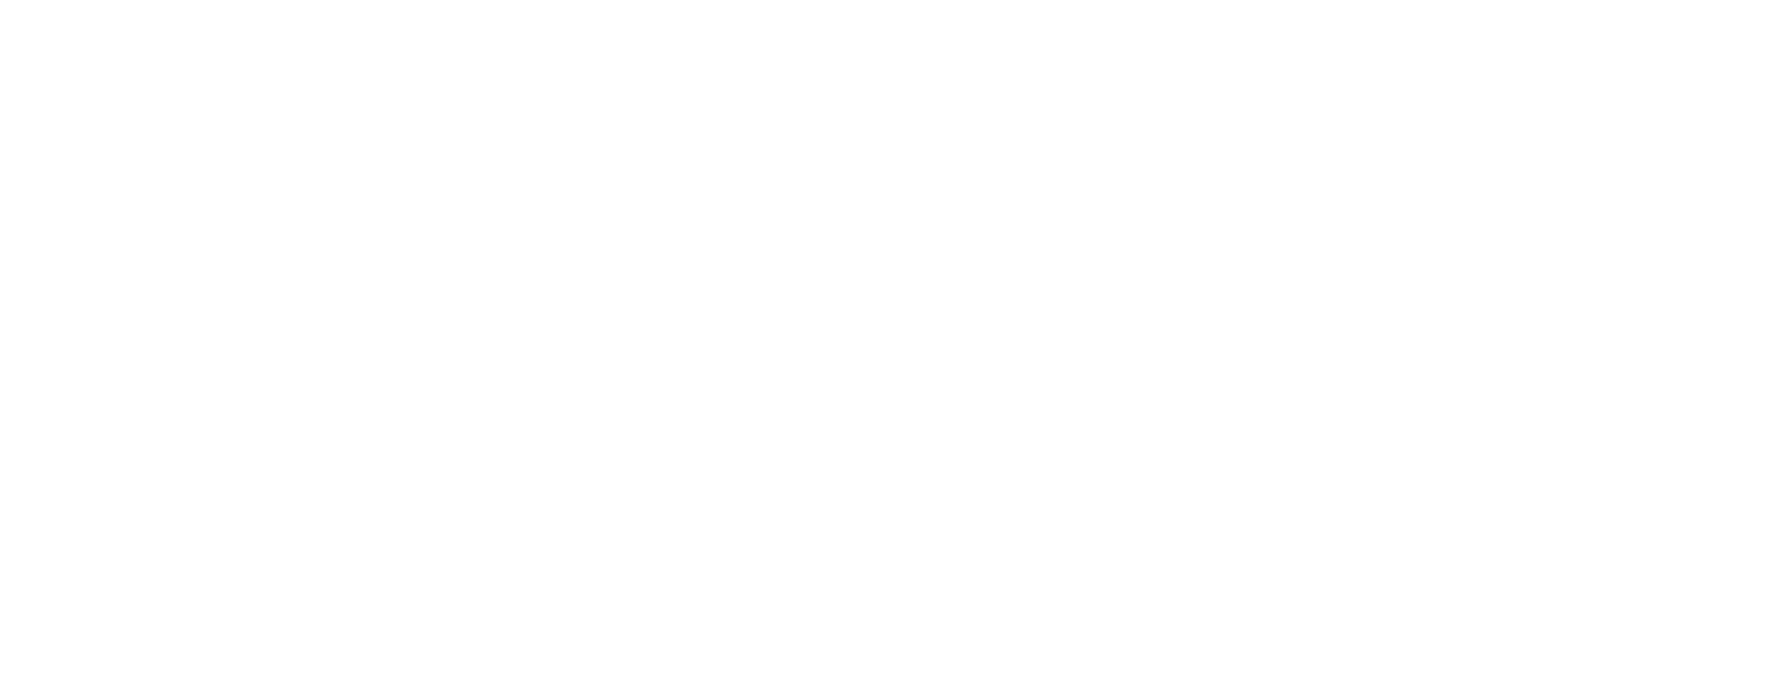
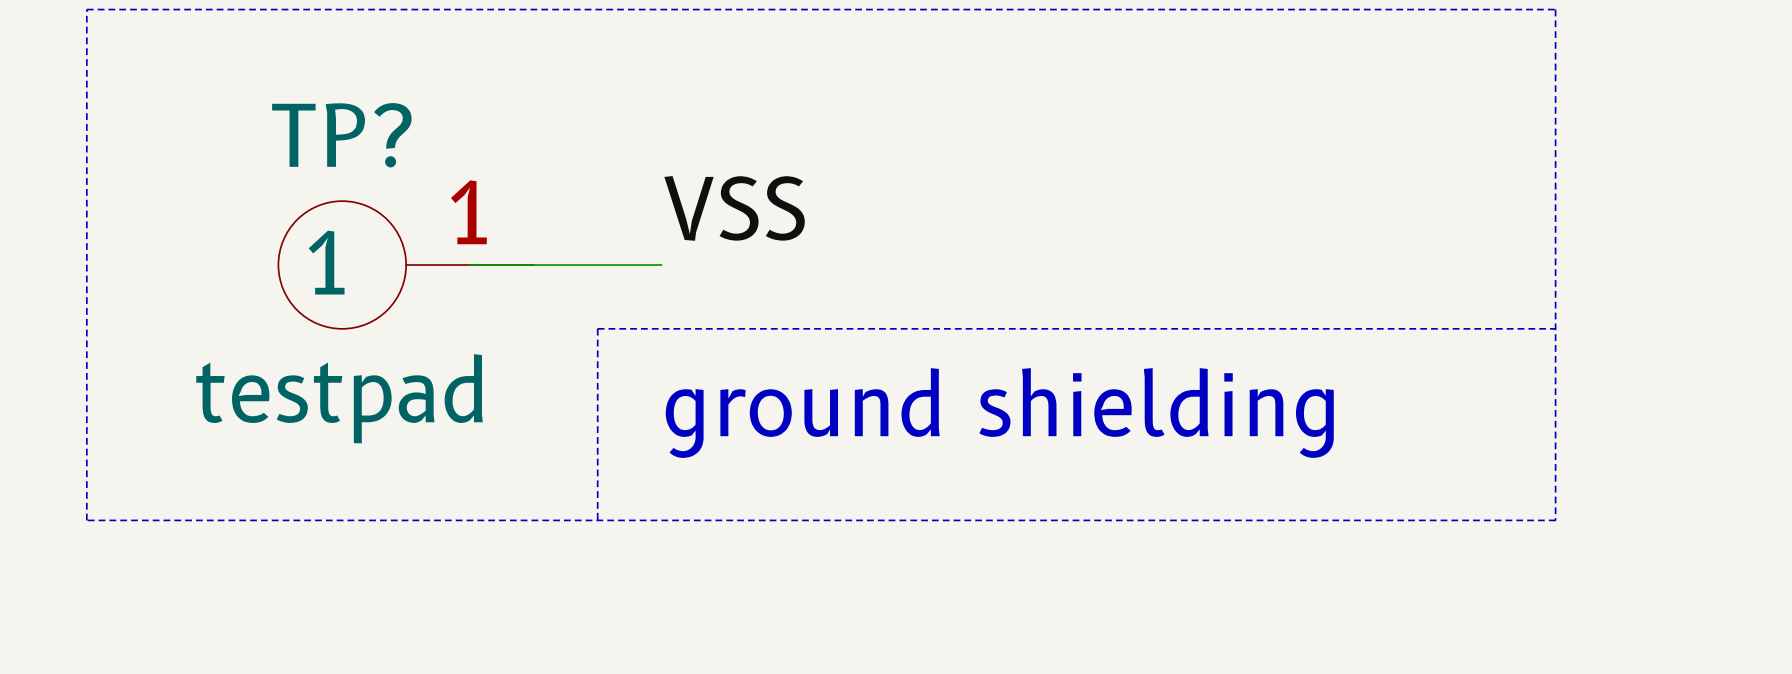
line: none -> (86, 9) (86, 520) (1555, 520) (1555, 9) (86, 9)
label: none -> VSS (734, 208)
TP?: none -> testpad (406, 264)
wire: none -> (469, 264) (661, 264)
line: none -> (1555, 328) (597, 328) (597, 520)
text: none -> ground shielding (999, 413)

